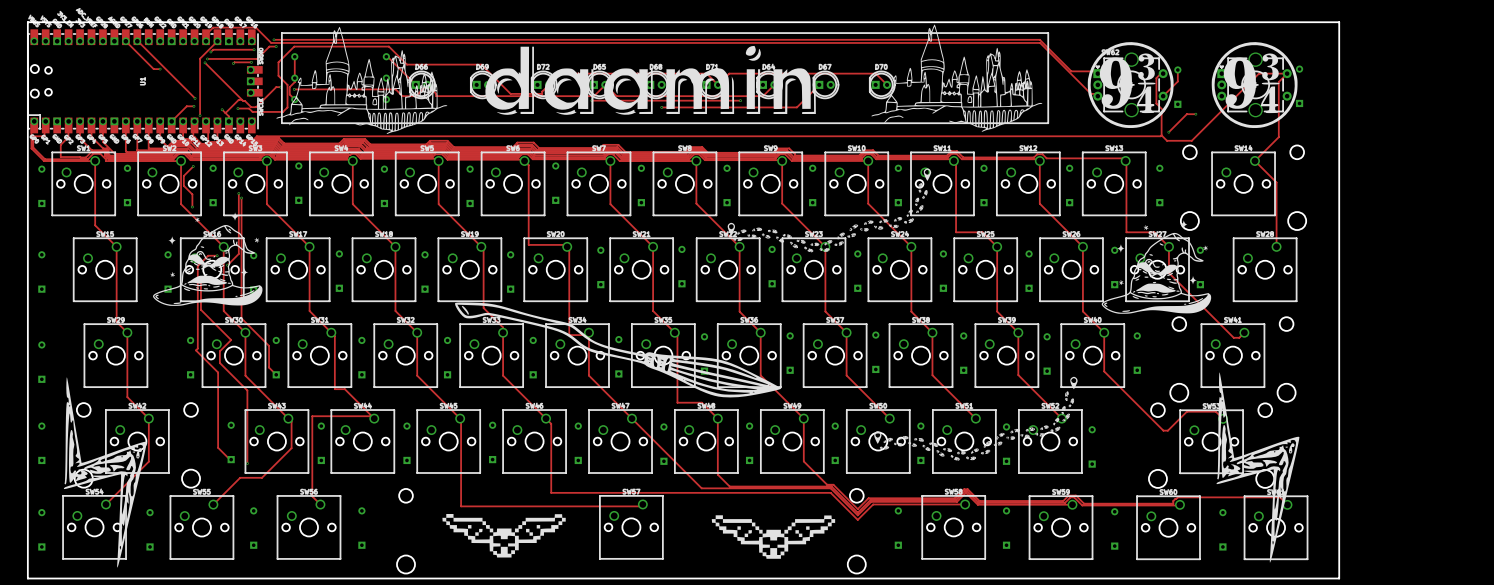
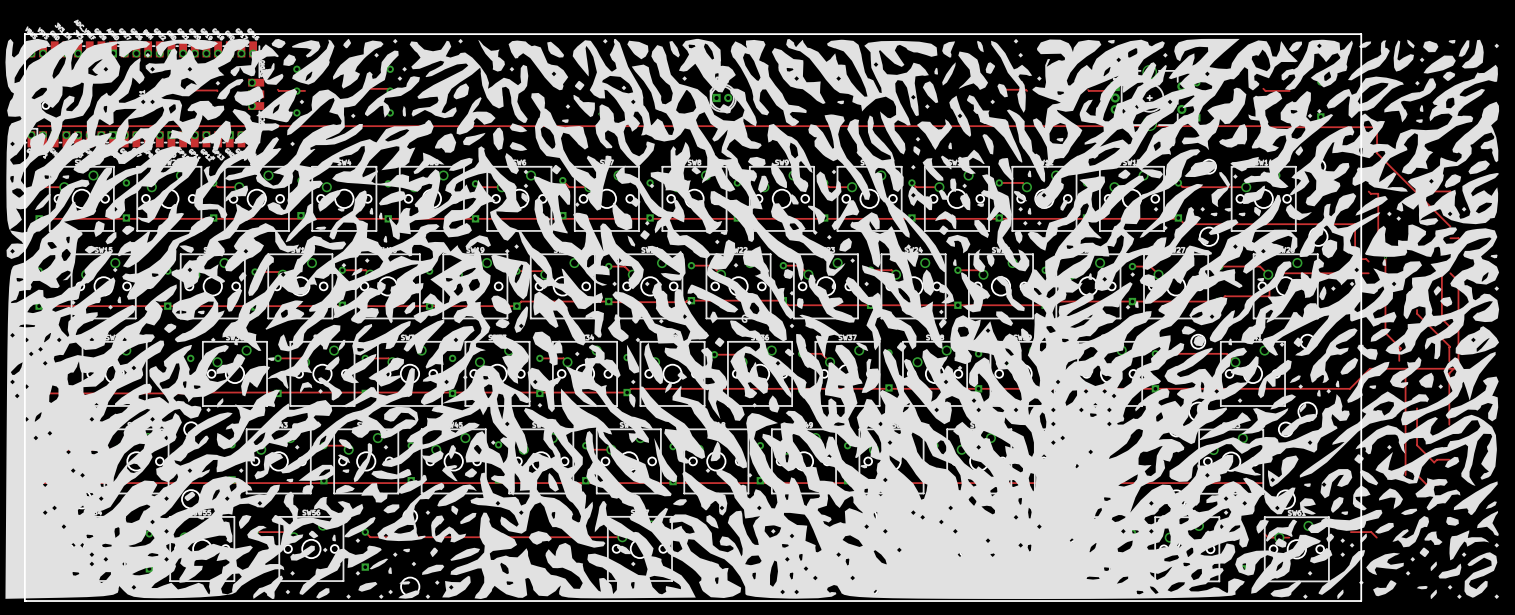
drawing: [871, 24, 1043, 132] -> none
drawing: [276, 26, 448, 134] -> none
line: (281, 33) (1048, 33) (1048, 123) (281, 123) (281, 33) -> none
track: (273, 39) (1039, 39) (1071, 71) (1095, 71) (1097, 73) -> none
via: (273, 39) -> none
track: (125, 41) (153, 69) (160, 69) -> none
track: (137, 41) (195, 98) -> none
track: (206, 41) (206, 34) (213, 27) (255, 27) (271, 42) (1040, 42) (1091, 93) (1097, 96) -> none
track: (217, 41) (200, 58) (200, 115) -> none
drawing: [1087, 42, 1174, 129] -> none
drawing: [1211, 42, 1298, 129] -> none
drawing: [485, 45, 816, 115] -> none
track: (276, 46) (269, 46) (257, 58) (207, 58) -> none
via: (276, 46) -> none
track: (254, 49) (213, 49) (210, 51) -> none
via: (254, 49) -> none
via: (210, 51) -> none
track: (294, 56) (294, 82) (289, 87) (289, 94) (294, 99) -> none
track: (386, 56) (415, 84) -> none
via: (207, 58) -> none
track: (205, 62) (251, 107) (256, 107) (276, 87) (280, 87) -> none
via: (205, 62) -> none
track: (251, 62) (233, 63) -> none
via: (251, 62) -> none
via: (233, 63) -> none
via: (160, 69) -> none
track: (1177, 69) (1177, 81) (1163, 96) -> none
track: (1163, 73) (1156, 78) (1156, 103) (1163, 111) (1161, 113) (1161, 135) -> none
track: none -> (366, 88) (390, 88) (392, 90)
track: none -> (1263, 88) (1265, 90) (1289, 90)
track: none -> (277, 89) (305, 90)
track: none -> (1000, 89) (1027, 90)
track: none -> (190, 90) (217, 90)
track: none -> (1088, 90) (1114, 90)
part: (422, 84) -> none
part: (483, 84) -> none
part: (544, 84) -> none
part: (600, 84) -> none
part: (656, 84) -> none
part: (769, 84) -> none
track: (774, 84) (763, 96) (616, 96) (605, 84) (594, 96) (436, 96) (427, 84) (415, 96) (402, 96) (395, 89) (294, 89) -> none
track: (819, 84) (796, 107) (661, 107) -> none
part: (825, 84) -> none
part: (882, 84) -> none
track: (887, 84) (875, 73) (729, 73) (718, 84) (706, 73) (555, 73) (555, 78) (542, 93) (510, 93) (481, 64) (406, 64) (388, 46) (294, 46) (278, 62) (278, 75) (287, 84) (287, 107) (283, 111) (252, 111) (249, 108) (237, 108) -> none
part: (1254, 84) -> none
via: (280, 87) -> none
via: (294, 89) -> none
via: (195, 98) -> none
track: (242, 99) (238, 99) (225, 113) -> none
track: (591, 100) (740, 100) -> none
via: (740, 100) -> none
track: (193, 106) (186, 106) (171, 121) -> none
via: (193, 106) -> none
via: (661, 107) -> none
via: (237, 108) -> none
track: (222, 109) (228, 116) (228, 121) -> none
via: (222, 109) -> none
track: none -> (38, 126) (1260, 126) (1263, 123) (1266, 127) (1377, 127) (1377, 153) (1450, 226)
track: (1195, 114) (1186, 114) (1168, 132) -> none
via: (1195, 114) -> none
via: (200, 115) -> none
track: (34, 121) (31, 124) (31, 148) (44, 161) (95, 160) (95, 225) (116, 246) (116, 322) (127, 332) (127, 397) (148, 418) (148, 461) (105, 504) -> none
track: (45, 121) (44, 136) (33, 136) (33, 147) (44, 159) (87, 159) (93, 153) (100, 153) (105, 161) (181, 160) (181, 204) (223, 246) (223, 310) (245, 332) (245, 375) (291, 421) (291, 448) (262, 477) (240, 477) (213, 504) -> none
track: (68, 121) (68, 137) (60, 144) (60, 157) (80, 157) -> none
track: (80, 121) (80, 138) (91, 150) (105, 150) (109, 157) (172, 157) (178, 152) (185, 152) (191, 158) (260, 158) (264, 154) (269, 154) (274, 159) (351, 159) (352, 204) (395, 246) (395, 310) (417, 332) (417, 375) (461, 419) (461, 506) (640, 506) (642, 504) -> none
track: (91, 121) (91, 136) (103, 148) (108, 150) (110, 155) (171, 155) (177, 150) (186, 150) (192, 156) (259, 156) (263, 152) (270, 152) (275, 157) (347, 157) (349, 154) (355, 153) (360, 158) (436, 158) (438, 160) (438, 204) (483, 249) (483, 308) (503, 327) (503, 375) (551, 423) (551, 492) (830, 492) (857, 519) (873, 504) (965, 504) -> none
track: (102, 121) (102, 141) (114, 153) (170, 153) (176, 148) (187, 148) (193, 154) (259, 154) (263, 150) (272, 150) (276, 156) (345, 156) (349, 152) (356, 152) (361, 157) (432, 157) (435, 154) (442, 154) (447, 159) (523, 159) (528, 165) (528, 244) (565, 244) (569, 248) (569, 335) (586, 335) (588, 332) (588, 375) (701, 488) (830, 488) (857, 515) (871, 501) (956, 501) (965, 492) (977, 504) (1072, 504) -> none
track: (125, 121) (126, 152) (169, 152) (175, 146) (188, 146) (195, 152) (258, 152) (262, 148) (273, 148) (278, 154) (344, 154) (348, 150) (357, 150) (362, 155) (431, 155) (434, 152) (442, 152) (448, 157) (518, 157) (521, 154) (527, 154) (532, 159) (608, 159) (610, 160) (610, 204) (653, 246) (653, 310) (677, 335) (677, 402) (701, 402) (717, 418) (717, 474) (729, 486) (831, 486) (857, 512) (870, 500) (956, 500) (965, 491) (978, 502) (1065, 502) (1070, 497) (1074, 497) (1082, 505) (1179, 504) -> none
track: (137, 121) (137, 150) (169, 150) (174, 144) (189, 144) (195, 151) (257, 151) (261, 147) (273, 147) (279, 152) (343, 152) (347, 148) (359, 148) (363, 153) (431, 153) (434, 150) (443, 150) (449, 156) (517, 156) (521, 152) (528, 152) (533, 157) (605, 157) (608, 154) (613, 154) (619, 161) (696, 160) (696, 203) (739, 246) (739, 311) (760, 332) (760, 375) (803, 418) (803, 461) (827, 484) (833, 484) (857, 509) (868, 498) (955, 498) (964, 489) (967, 489) (979, 500) (1063, 500) (1068, 495) (1075, 495) (1084, 503) (1173, 503) (1173, 500) (1177, 497) (1279, 497) (1287, 504) -> none
track: (148, 121) (148, 148) (168, 148) (174, 142) (191, 142) (196, 149) (256, 149) (260, 145) (274, 145) (280, 150) (342, 150) (347, 146) (360, 146) (365, 151) (429, 151) (433, 148) (444, 148) (450, 154) (516, 154) (520, 150) (529, 150) (534, 155) (604, 155) (607, 152) (614, 152) (621, 159) (689, 159) (694, 154) (699, 154) (704, 160) (781, 160) (782, 203) (825, 246) (825, 311) (846, 332) (846, 375) (889, 418) -> none
track: (160, 121) (160, 139) (167, 146) (173, 140) (192, 140) (199, 147) (256, 147) (260, 143) (275, 143) (281, 148) (342, 148) (346, 144) (360, 144) (366, 149) (429, 149) (432, 146) (445, 146) (451, 152) (516, 152) (519, 148) (530, 148) (535, 153) (603, 153) (606, 150) (615, 150) (622, 157) (688, 157) (693, 152) (699, 152) (705, 158) (775, 158) (779, 154) (785, 154) (791, 160) (868, 160) (868, 203) (911, 246) (911, 311) (932, 332) (932, 375) (975, 418) -> none
track: (183, 121) (183, 138) (193, 138) (200, 145) (255, 145) (259, 141) (276, 141) (282, 147) (341, 147) (345, 142) (362, 142) (367, 148) (428, 148) (431, 144) (446, 144) (452, 150) (515, 150) (519, 146) (531, 146) (536, 151) (602, 151) (605, 148) (616, 148) (623, 155) (687, 155) (692, 150) (700, 150) (706, 156) (775, 156) (779, 152) (786, 152) (793, 159) (861, 159) (865, 154) (871, 154) (876, 159) (952, 159) (956, 163) (956, 232) (982, 232) (997, 246) (997, 311) (1018, 332) (1018, 375) (1061, 418) -> none
track: (194, 121) (193, 137) (201, 143) (254, 143) (258, 139) (278, 139) (283, 145) (340, 145) (344, 140) (364, 140) (369, 146) (427, 146) (430, 143) (447, 143) (452, 148) (513, 148) (517, 144) (532, 144) (537, 149) (601, 149) (604, 147) (617, 147) (624, 153) (686, 153) (690, 148) (701, 148) (707, 154) (774, 154) (778, 150) (787, 150) (794, 157) (860, 157) (864, 152) (872, 152) (877, 157) (947, 157) (951, 153) (956, 153) (961, 159) (1038, 159) (1039, 160) (1039, 203) (1082, 246) (1082, 311) (1104, 332) (1104, 371) (1163, 430) (1167, 430) (1186, 411) (1215, 411) (1223, 418) -> none
track: (206, 121) (208, 123) (208, 141) (253, 141) (257, 138) (278, 138) (284, 143) (339, 143) (343, 138) (365, 138) (370, 144) (426, 144) (429, 140) (447, 140) (453, 147) (512, 147) (517, 142) (533, 142) (539, 148) (600, 148) (603, 144) (618, 144) (625, 152) (685, 152) (690, 147) (702, 147) (707, 152) (773, 152) (777, 148) (789, 148) (795, 155) (859, 155) (864, 150) (873, 150) (878, 155) (947, 155) (951, 151) (956, 151) (963, 157) (1034, 157) (1037, 154) (1042, 154) (1046, 158) (1123, 158) (1126, 161) (1126, 232) (1154, 232) (1168, 246) (1168, 273) (1233, 337) (1239, 337) (1244, 332) -> none
track: (217, 121) (217, 140) (252, 140) (256, 136) (1161, 135) -> none
via: (1168, 132) -> none
track: (1161, 135) (1167, 140) (1191, 140) (1258, 73) (1287, 73) (1278, 81) (1278, 137) (1254, 160) (1276, 182) (1276, 246) -> none
track: (80, 156) (86, 157) (91, 152) (104, 152) (104, 155) (108, 159) (173, 159) (178, 153) (184, 153) (190, 160) (266, 160) (266, 204) (309, 246) (309, 310) (334, 336) (334, 389) (344, 389) (374, 418) -> none
track: none -> (562, 180) (569, 187) (589, 187)
track: (193, 166) (183, 175) (183, 185) (192, 194) (192, 207) -> none
via: (193, 166) -> none
track: none -> (213, 182) (217, 187) (239, 187)
drawing: [727, 168, 932, 253] -> none
track: none -> (824, 182) (828, 187) (852, 187)
track: none -> (911, 182) (916, 187) (939, 187)
track: none -> (999, 182) (1022, 182) (1026, 187)
track: none -> (1178, 182) (1182, 187) (1246, 187)
track: none -> (39, 183) (42, 187) (64, 187)
track: none -> (475, 183) (478, 187) (501, 187)
track: none -> (1368, 191) (1370, 193) (1378, 193) (1378, 235) (1382, 239) (1372, 249)
track: none -> (1431, 191) (1450, 191)
track: (238, 193) (238, 253) (227, 265) -> none
via: (238, 193) -> none
track: (241, 198) (241, 318) (269, 345) (269, 367) (276, 374) -> none
via: (241, 198) -> none
track: none -> (39, 218) (1178, 217) (1184, 224) (1355, 224) (1355, 258) (1366, 259) (1368, 261)
via: (192, 207) -> none
drawing: [153, 212, 263, 306] -> none
drawing: [1101, 220, 1212, 314] -> none
track: none -> (1450, 238) (1458, 238) (1463, 243)
track: none -> (1385, 257) (1385, 333) (1400, 348) (1399, 360)
via: none -> (1385, 257)
track: none -> (1450, 261) (1441, 268) (1441, 318) (1449, 326)
track: none -> (691, 265) (711, 265) (721, 274)
track: none -> (783, 265) (799, 265) (808, 274)
track: none -> (608, 266) (624, 266) (632, 274)
track: none -> (1132, 266) (1150, 266) (1158, 274)
track: none -> (1219, 266) (1260, 266) (1268, 274)
track: none -> (342, 270) (365, 270) (370, 274)
track: none -> (870, 270) (891, 270) (896, 274)
track: none -> (957, 270) (979, 270) (983, 274)
track: none -> (516, 271) (541, 271) (545, 274)
track: (217, 255) (208, 255) (197, 266) (197, 348) (196, 350) (218, 372) (218, 447) (231, 459) -> none
via: (217, 255) -> none
track: none -> (255, 272) (280, 272) (282, 274)
track: none -> (1368, 273) (1281, 273) (1269, 285) (1269, 296) (1224, 296) (1219, 301) (1048, 301) (1045, 305) (787, 305) (783, 300) (687, 300) (685, 302) (521, 301) (516, 306) (39, 306)
track: none -> (1450, 273) (1458, 281) (1458, 364) (1449, 373) (1449, 424)
via: (227, 265) -> none
track: (200, 280) (200, 309) (231, 340) (219, 351) (219, 363) (247, 390) (247, 463) -> none
track: none -> (1417, 309) (1417, 313) (1450, 346) (1449, 361)
part: none -> (752, 318)
drawing: [455, 302, 782, 398] -> none
track: none -> (801, 353) (821, 353) (830, 362)
track: none -> (1155, 353) (1227, 353) (1235, 362)
track: none -> (714, 354) (735, 354) (742, 362)
track: none -> (278, 358) (301, 358) (304, 362)
track: none -> (365, 358) (388, 358) (392, 362)
track: none -> (539, 358) (563, 358) (567, 362)
track: none -> (1453, 368) (1369, 368) (1349, 388) (630, 388) (627, 392) (43, 393) (39, 398)
track: none -> (1405, 376) (1405, 475)
drawing: [1216, 372, 1300, 563] -> none
drawing: [874, 376, 1078, 461] -> none
drawing: [63, 377, 147, 568] -> none
track: none -> (1417, 408) (1417, 445) (1434, 462) (1436, 459) (1449, 459)
track: (371, 416) (312, 416) (312, 496) (320, 504) -> none
track: none -> (323, 445) (344, 445) (348, 449)
track: none -> (585, 445) (589, 449) (611, 449)
track: none -> (1417, 475) (1426, 484) (1438, 484)
track: none -> (39, 480) (41, 483) (1263, 483)
via: (247, 463) -> none
track: none -> (255, 532) (288, 532) (293, 537)
track: none -> (365, 532) (370, 537) (622, 537)
track: none -> (1350, 532) (1371, 532) (1376, 537)
track: none -> (1264, 533) (1268, 537) (1289, 537)
drawing: [442, 514, 566, 558] -> none
drawing: [711, 515, 836, 559] -> none

